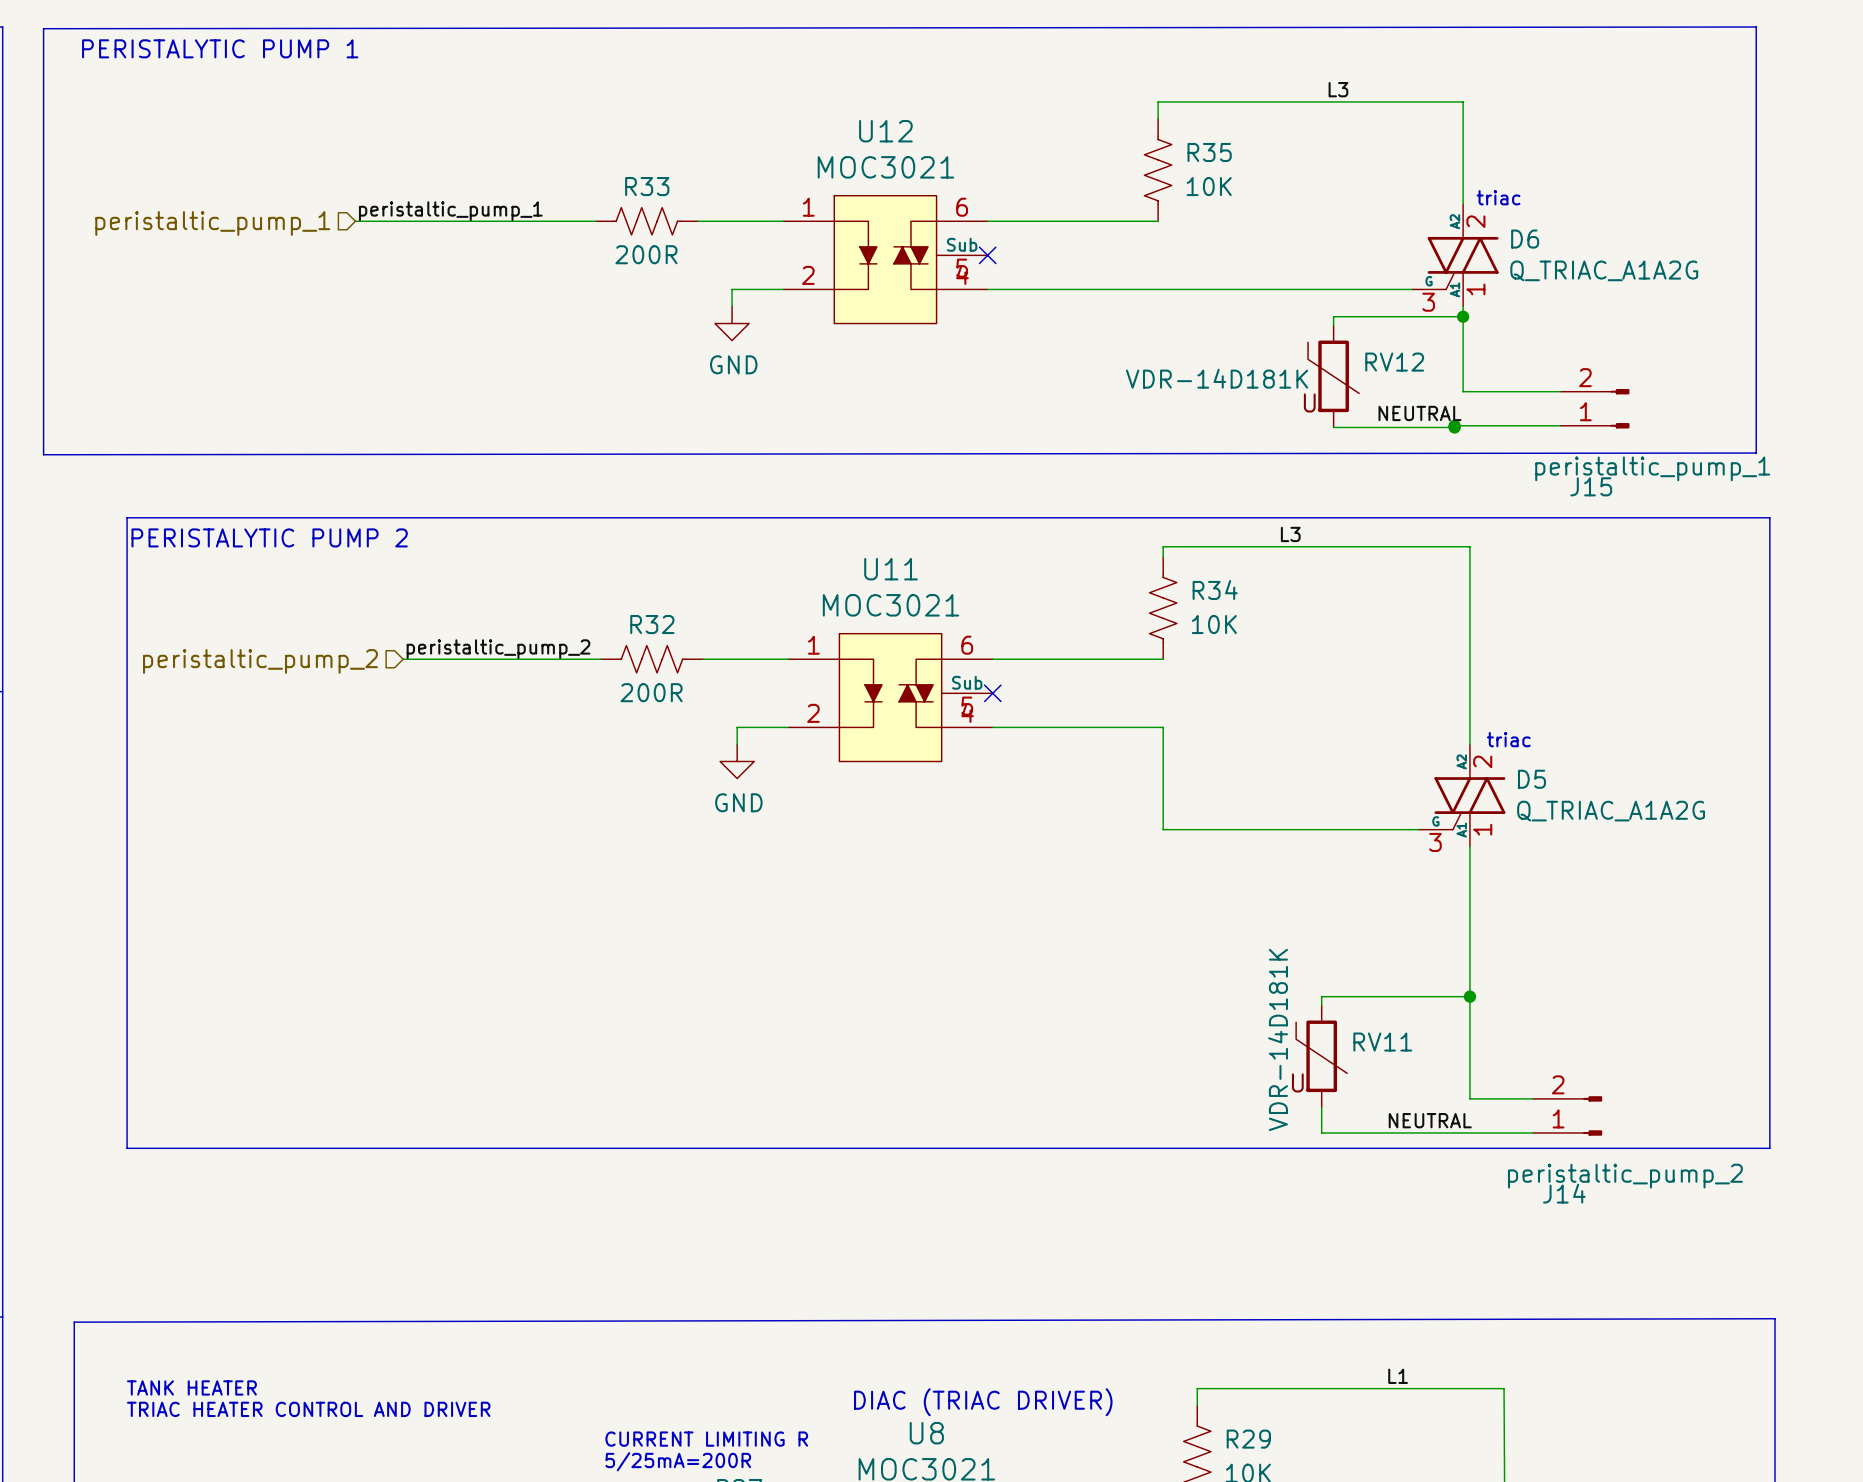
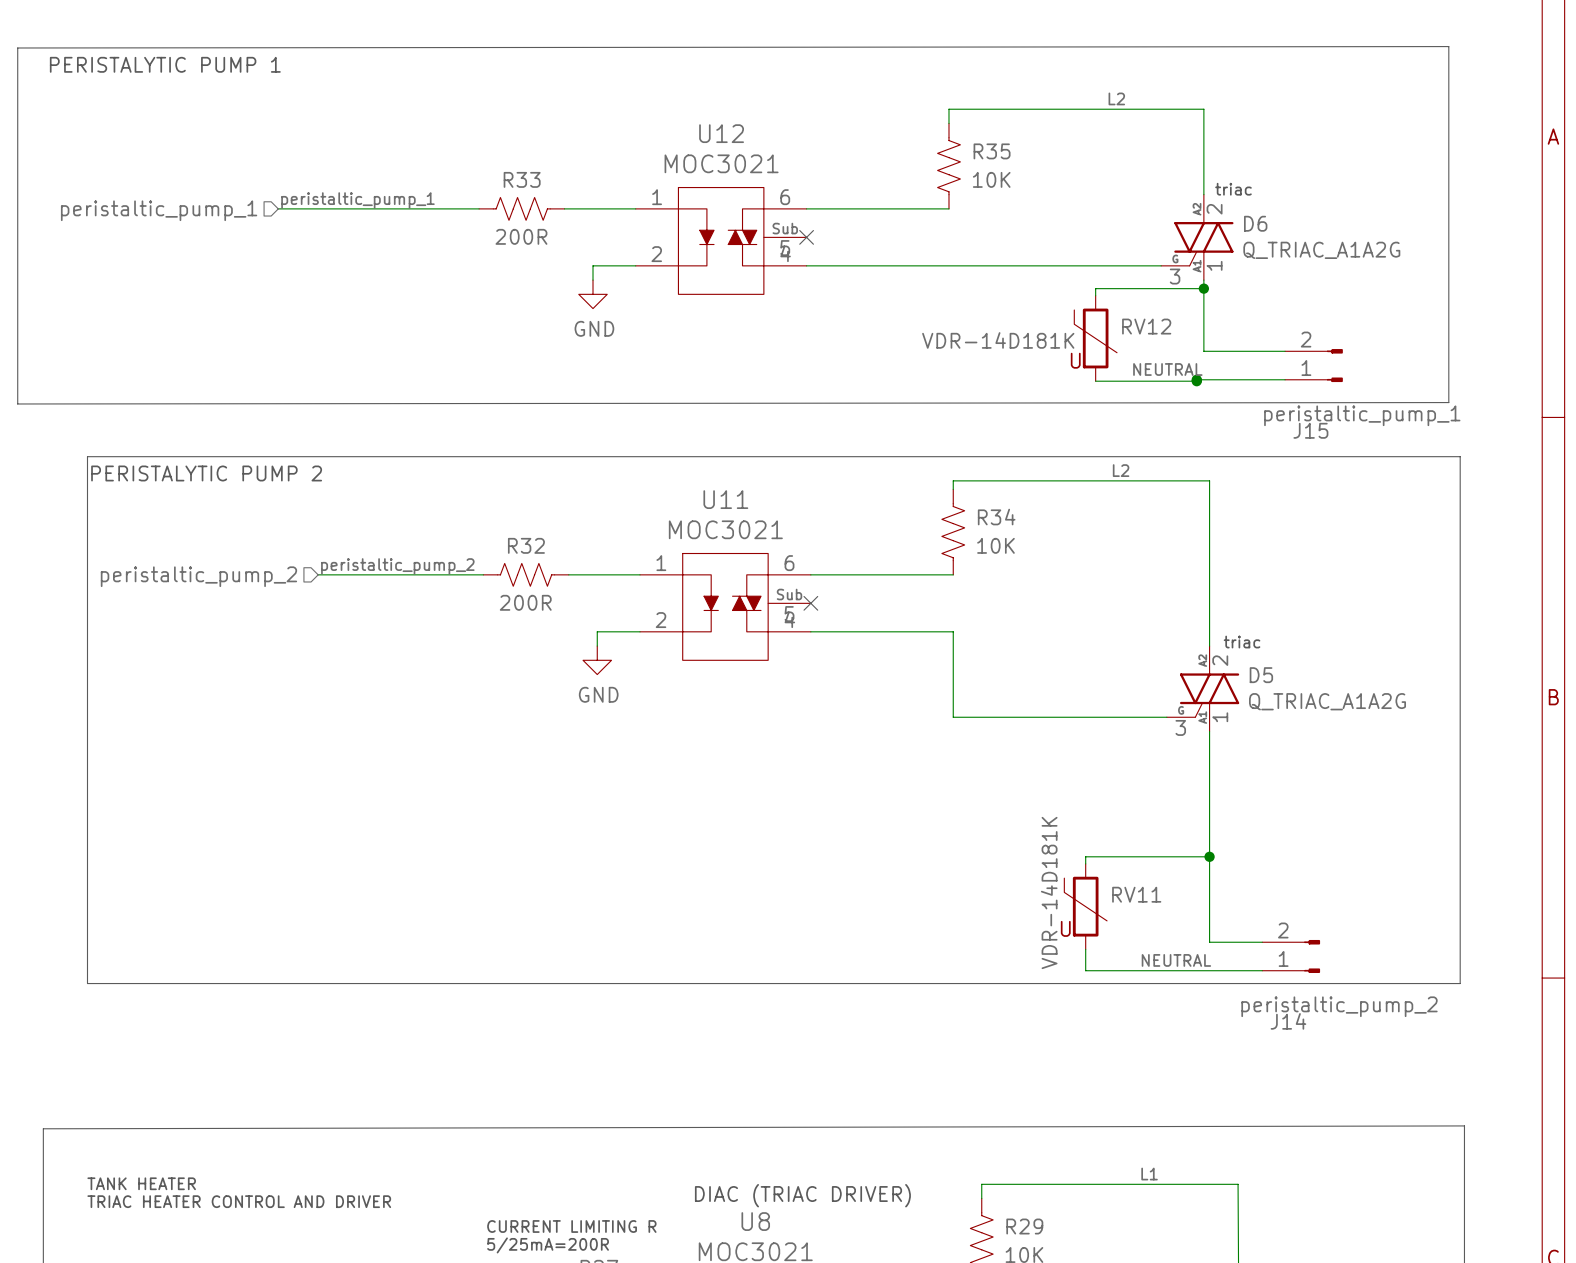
label: L3 (1338, 89) -> none
label: none -> L2 (1116, 98)
label: L3 (1290, 534) -> none
label: none -> L2 (1121, 470)

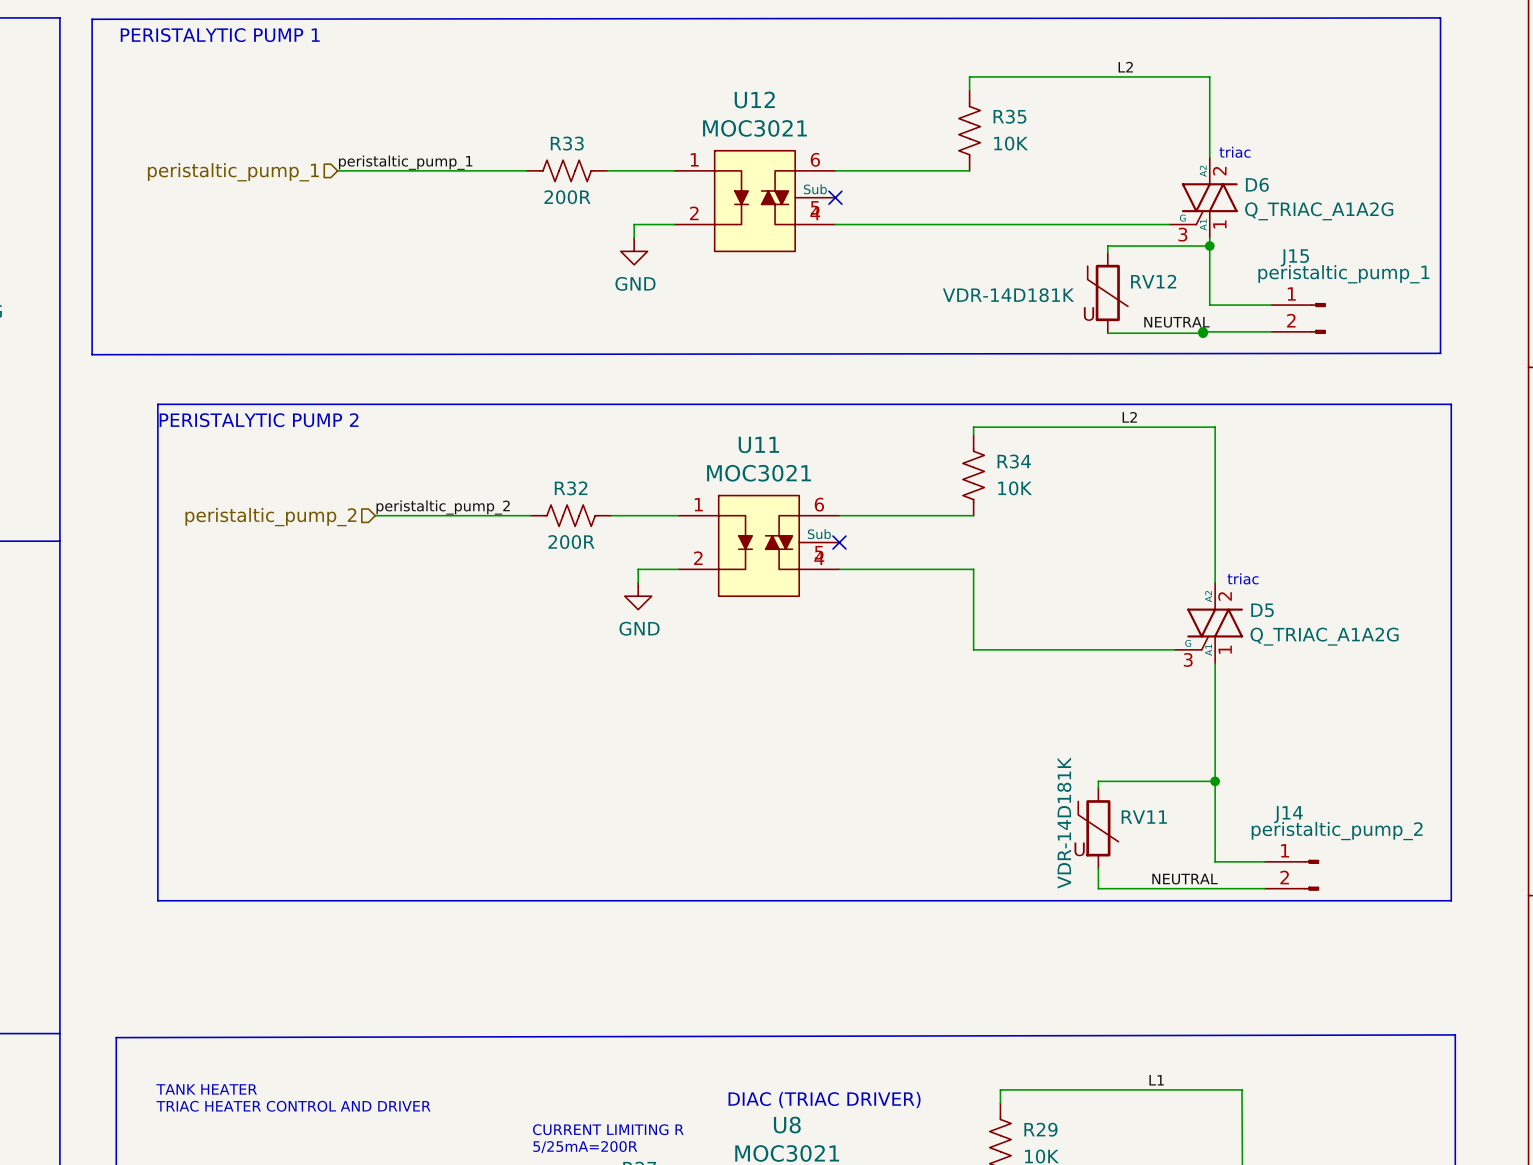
J15 flip: as is (1334, 365) -> up-down (1318, 318)
J14 flip: as is (1312, 956) -> up-down (1311, 875)

